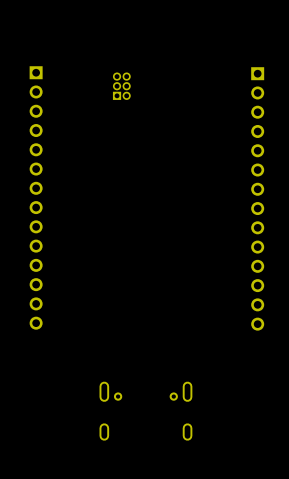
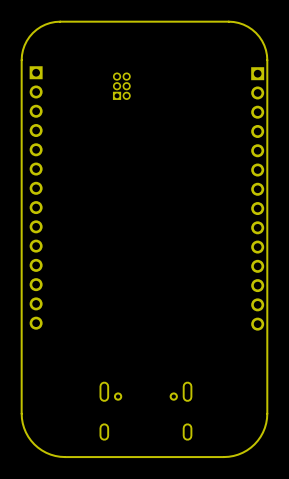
board edge: none -> (228, 21) (55, 22) (36, 29) (24, 45) (21, 60) (21, 413) (24, 428) (28, 436) (37, 447) (46, 452) (65, 457) (228, 456) (247, 450) (257, 440) (263, 432) (267, 413) (266, 55) (264, 45) (256, 32) (243, 24) (228, 21)

